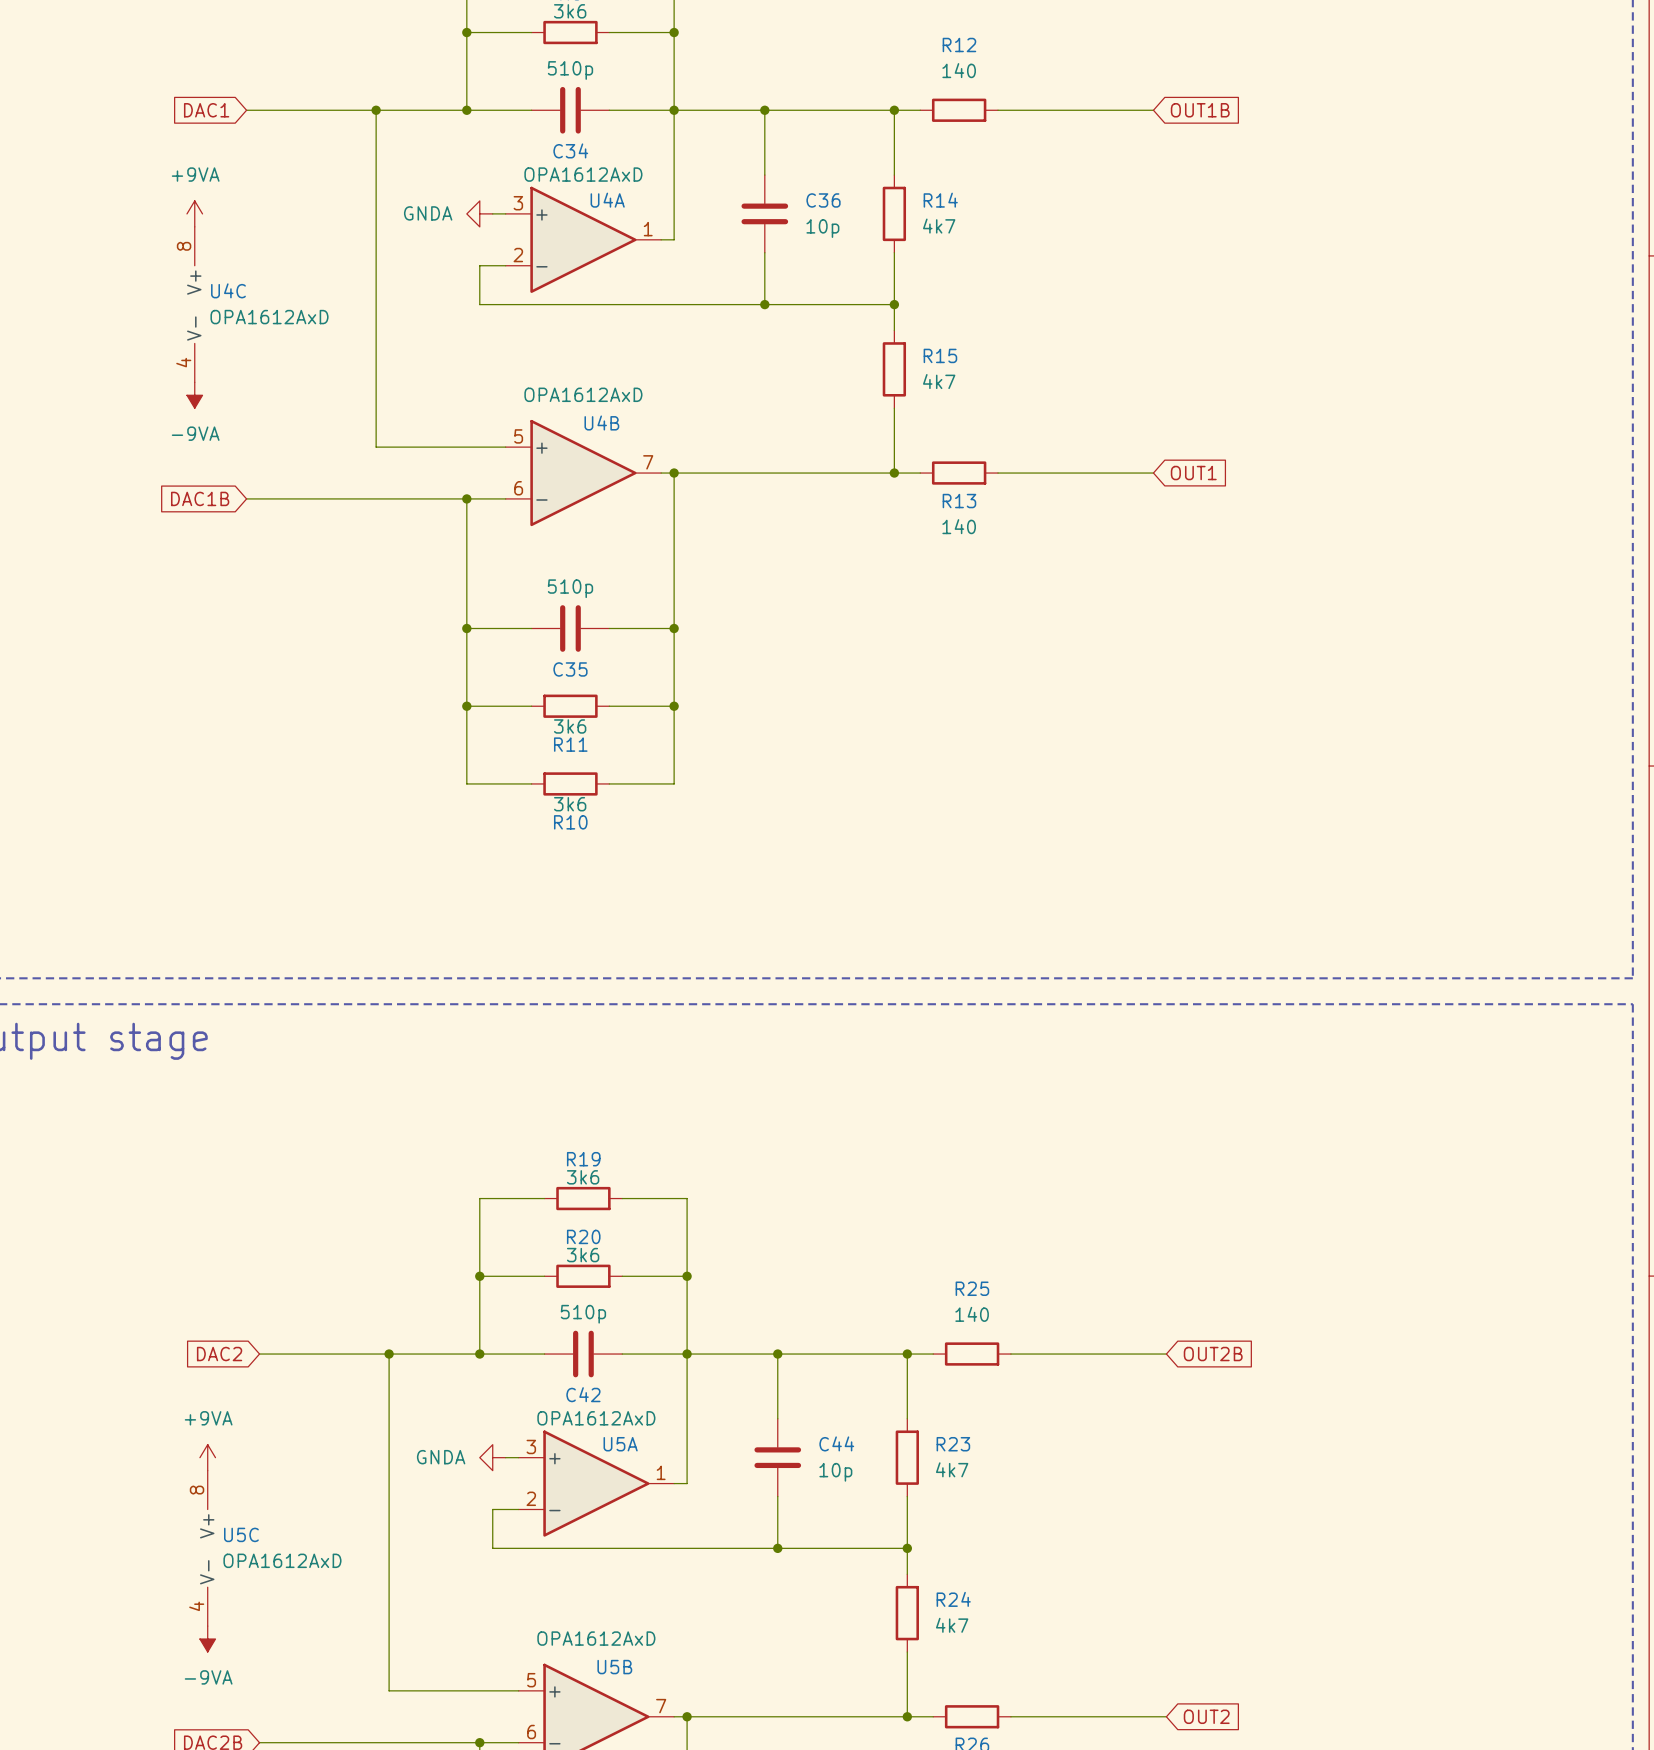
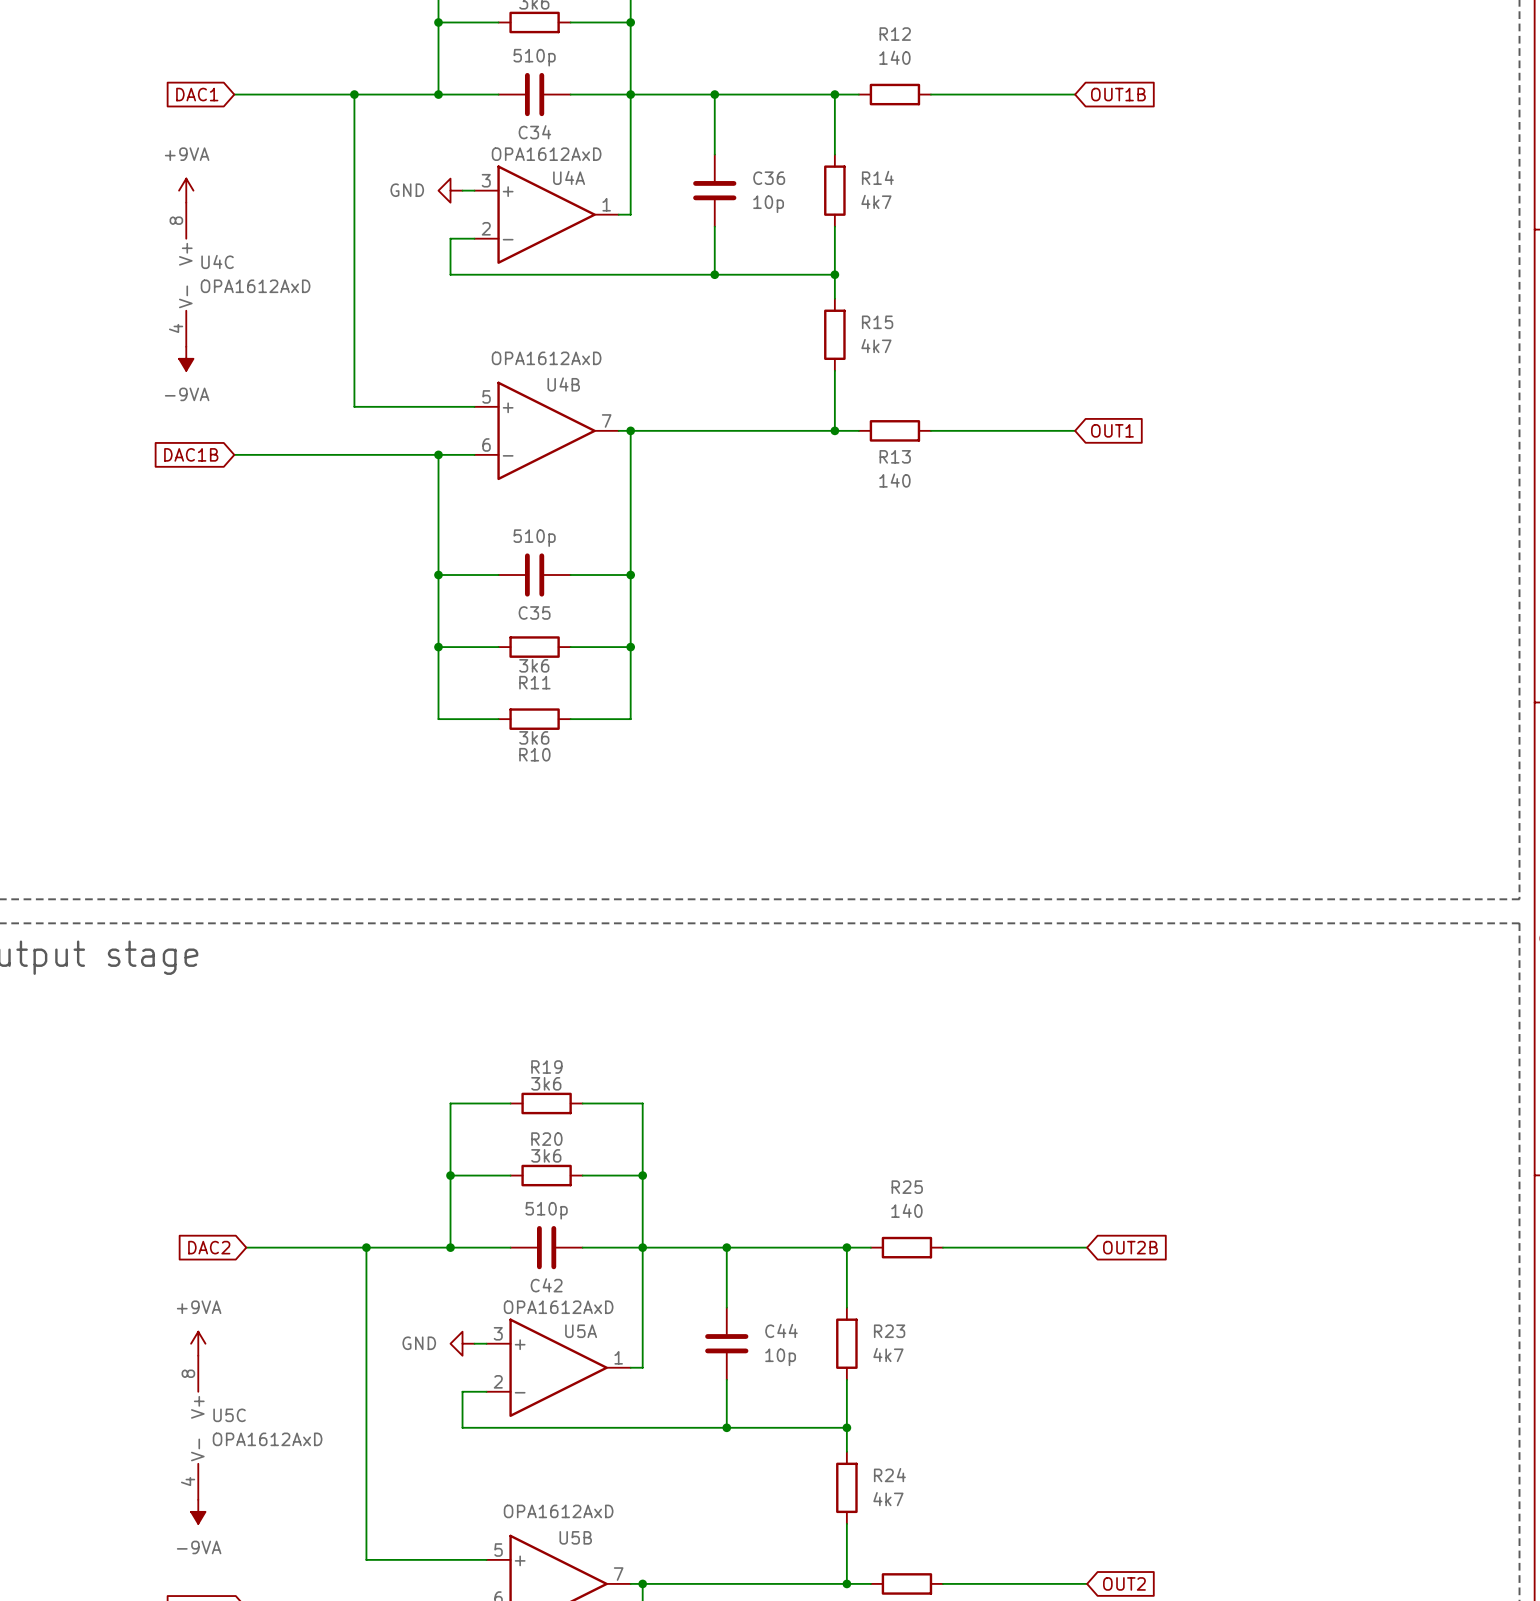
power symbol: GNDA (479, 213) -> GND (450, 190)
power symbol: GNDA (492, 1457) -> GND (462, 1343)

